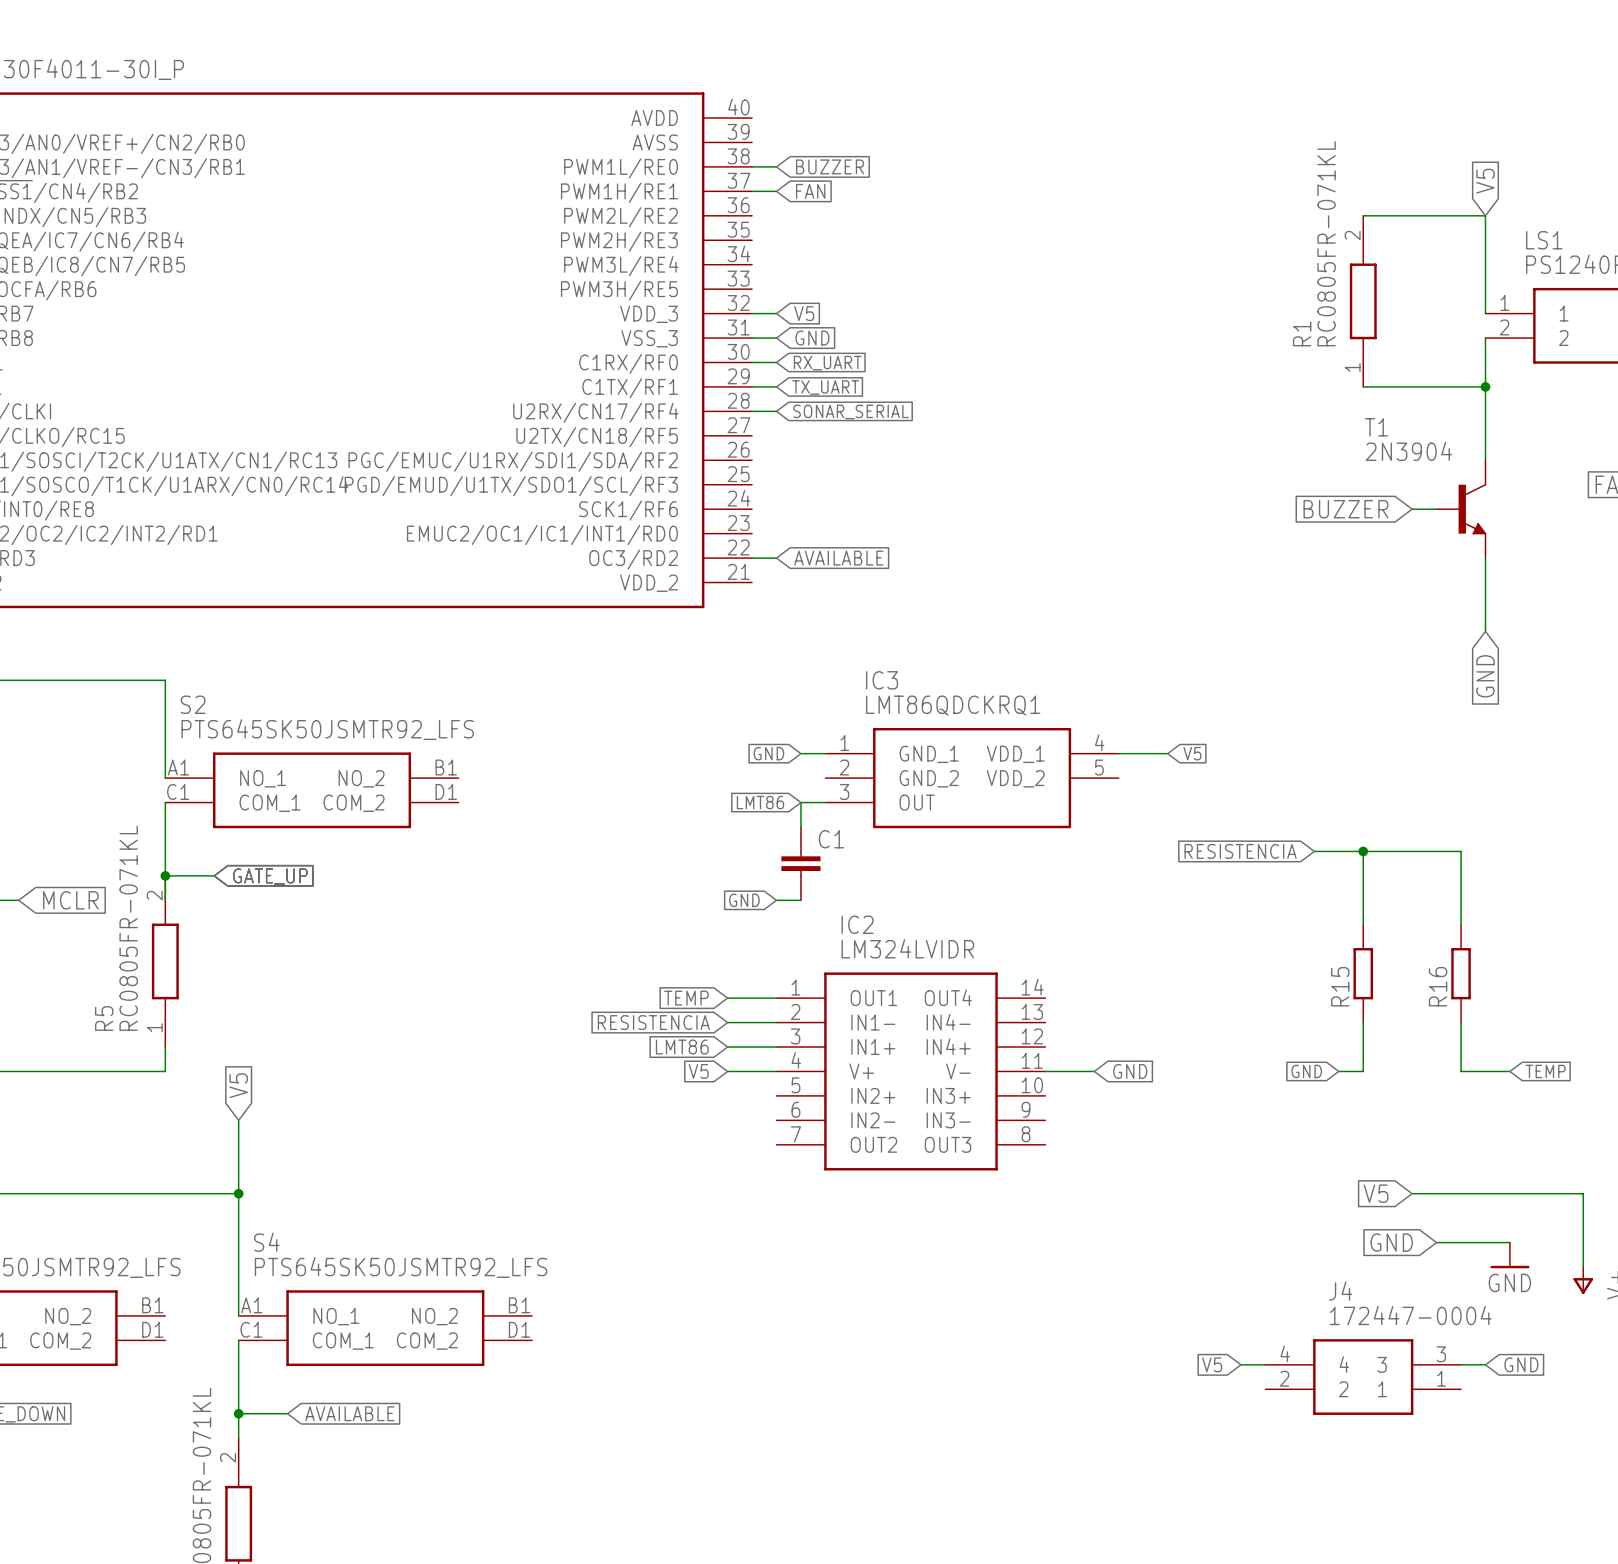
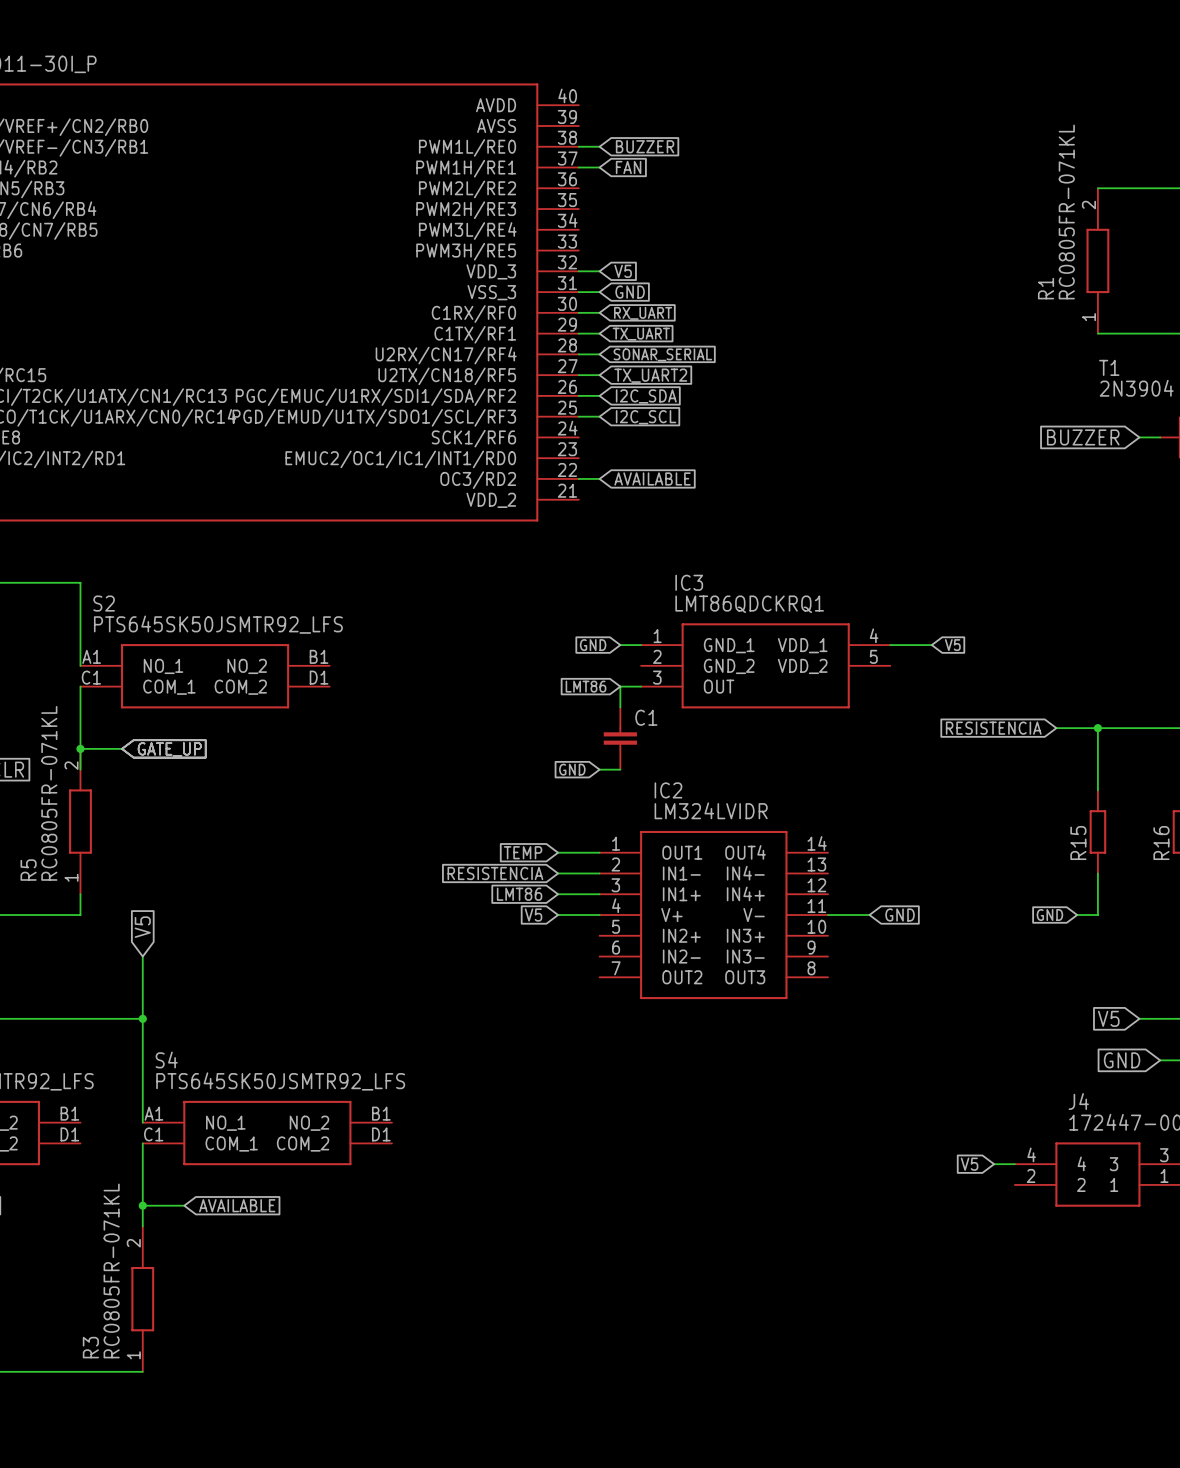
wire: none -> (578, 375) (599, 375)
global label: none -> TX_UART2 (650, 375)
wire: none -> (578, 395) (599, 395)
global label: none -> I2C_SDA (646, 396)
wire: none -> (578, 416) (599, 416)
global label: none -> I2C_SCL (646, 417)

